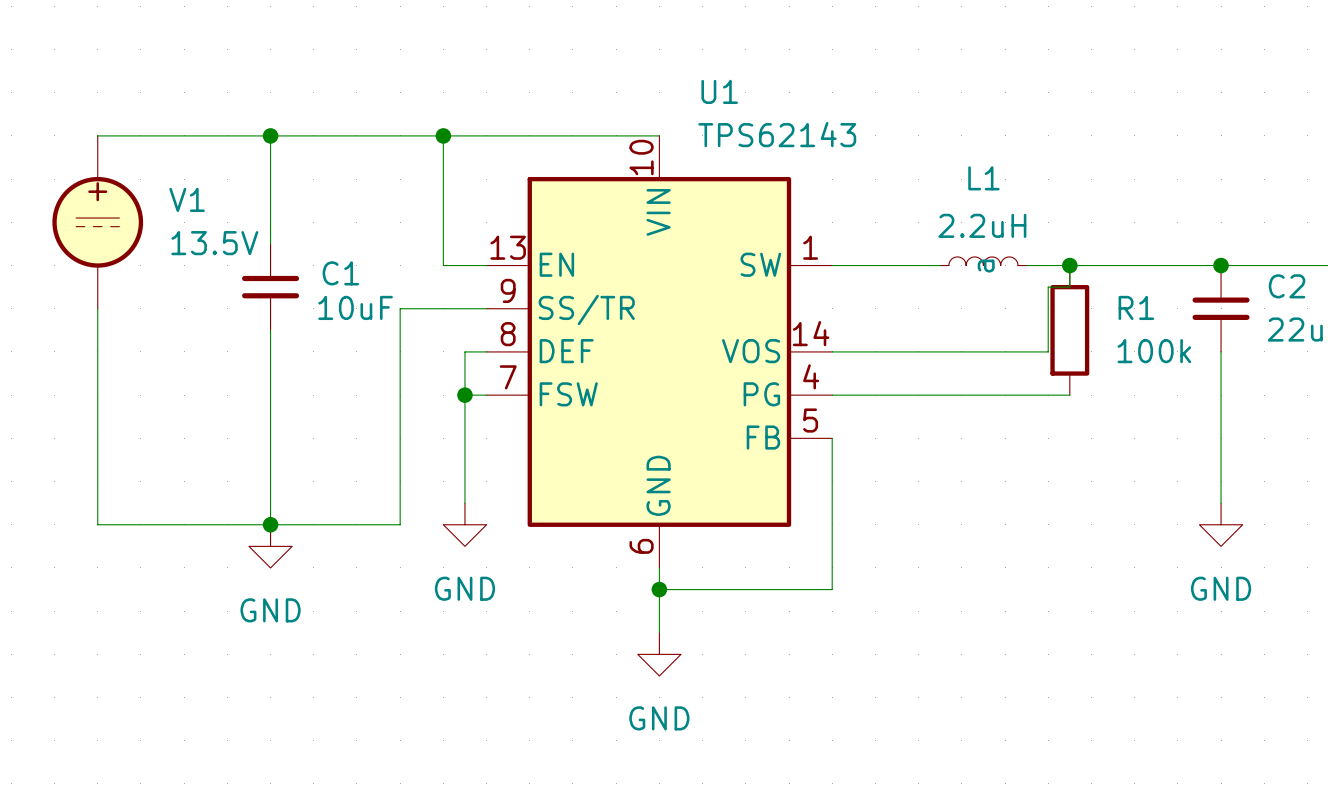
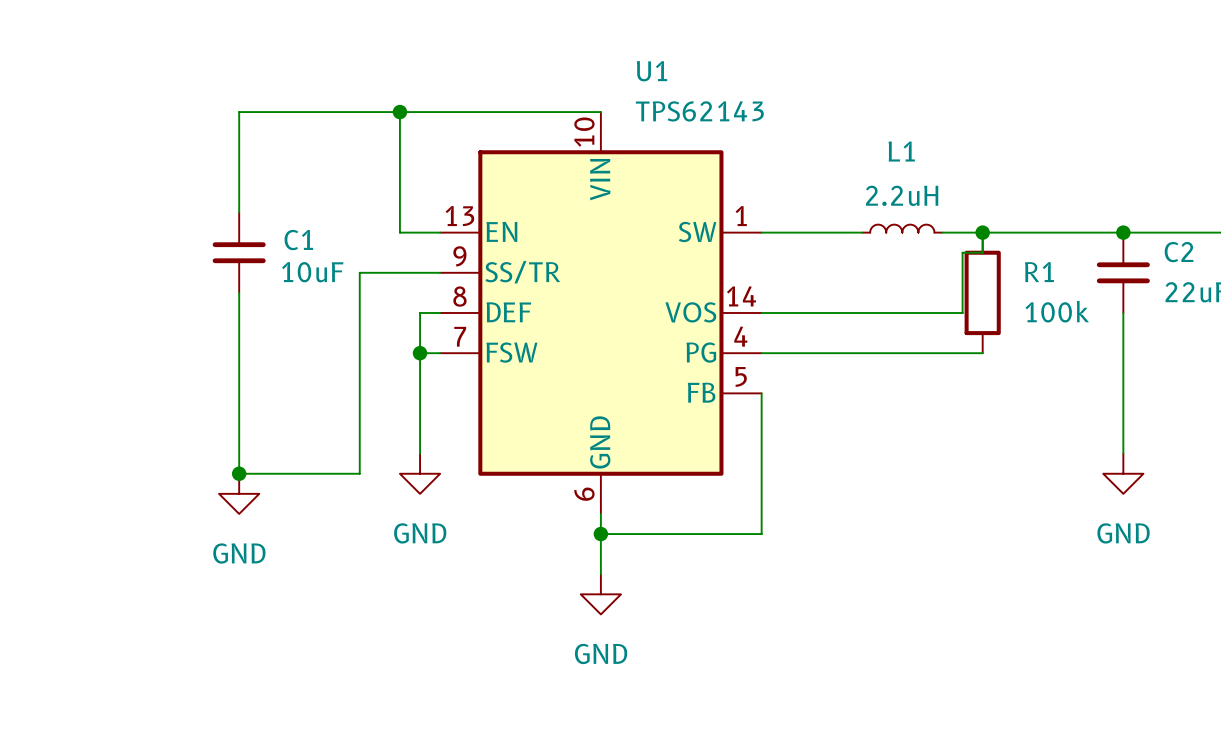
wire: (97, 135) (270, 135) -> none
junction: (270, 135) -> none
V1: 13.5V (97, 222) -> none
L1 text: a (986, 266) -> none
wire: (97, 308) (97, 524) (270, 524) -> none

